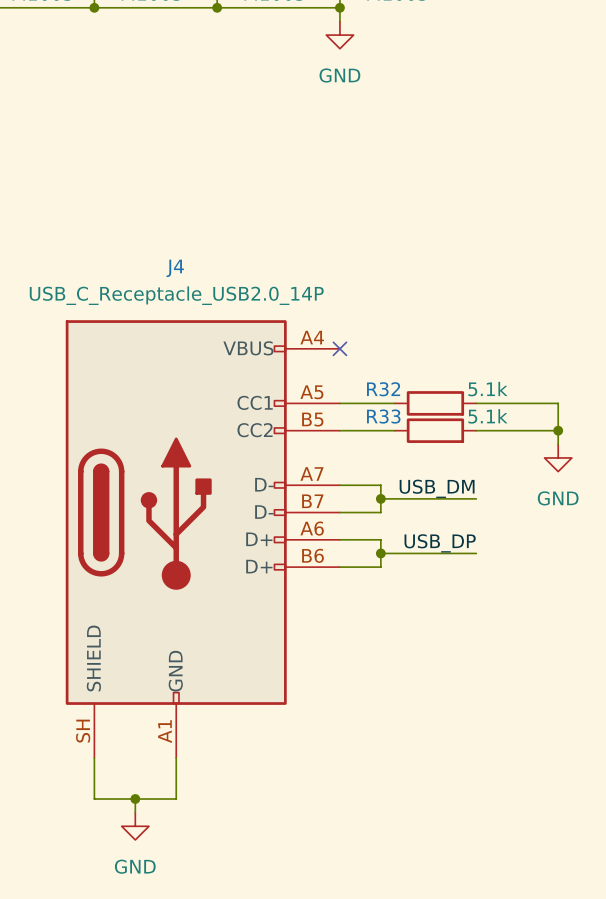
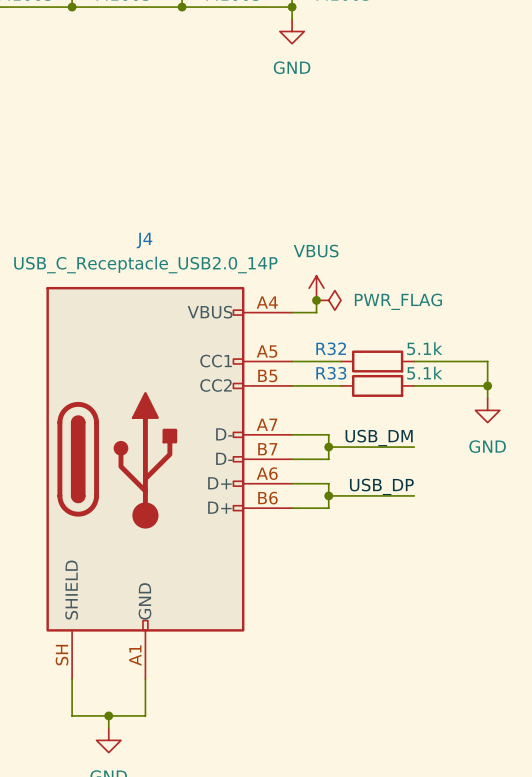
power symbol: none -> VBUS (316, 288)
wire: none -> (316, 300) (316, 312) (292, 312)
junction: none -> (316, 300)
power symbol: none -> PWR_FLAG (328, 300)
no-connect mark: (339, 348) -> none

